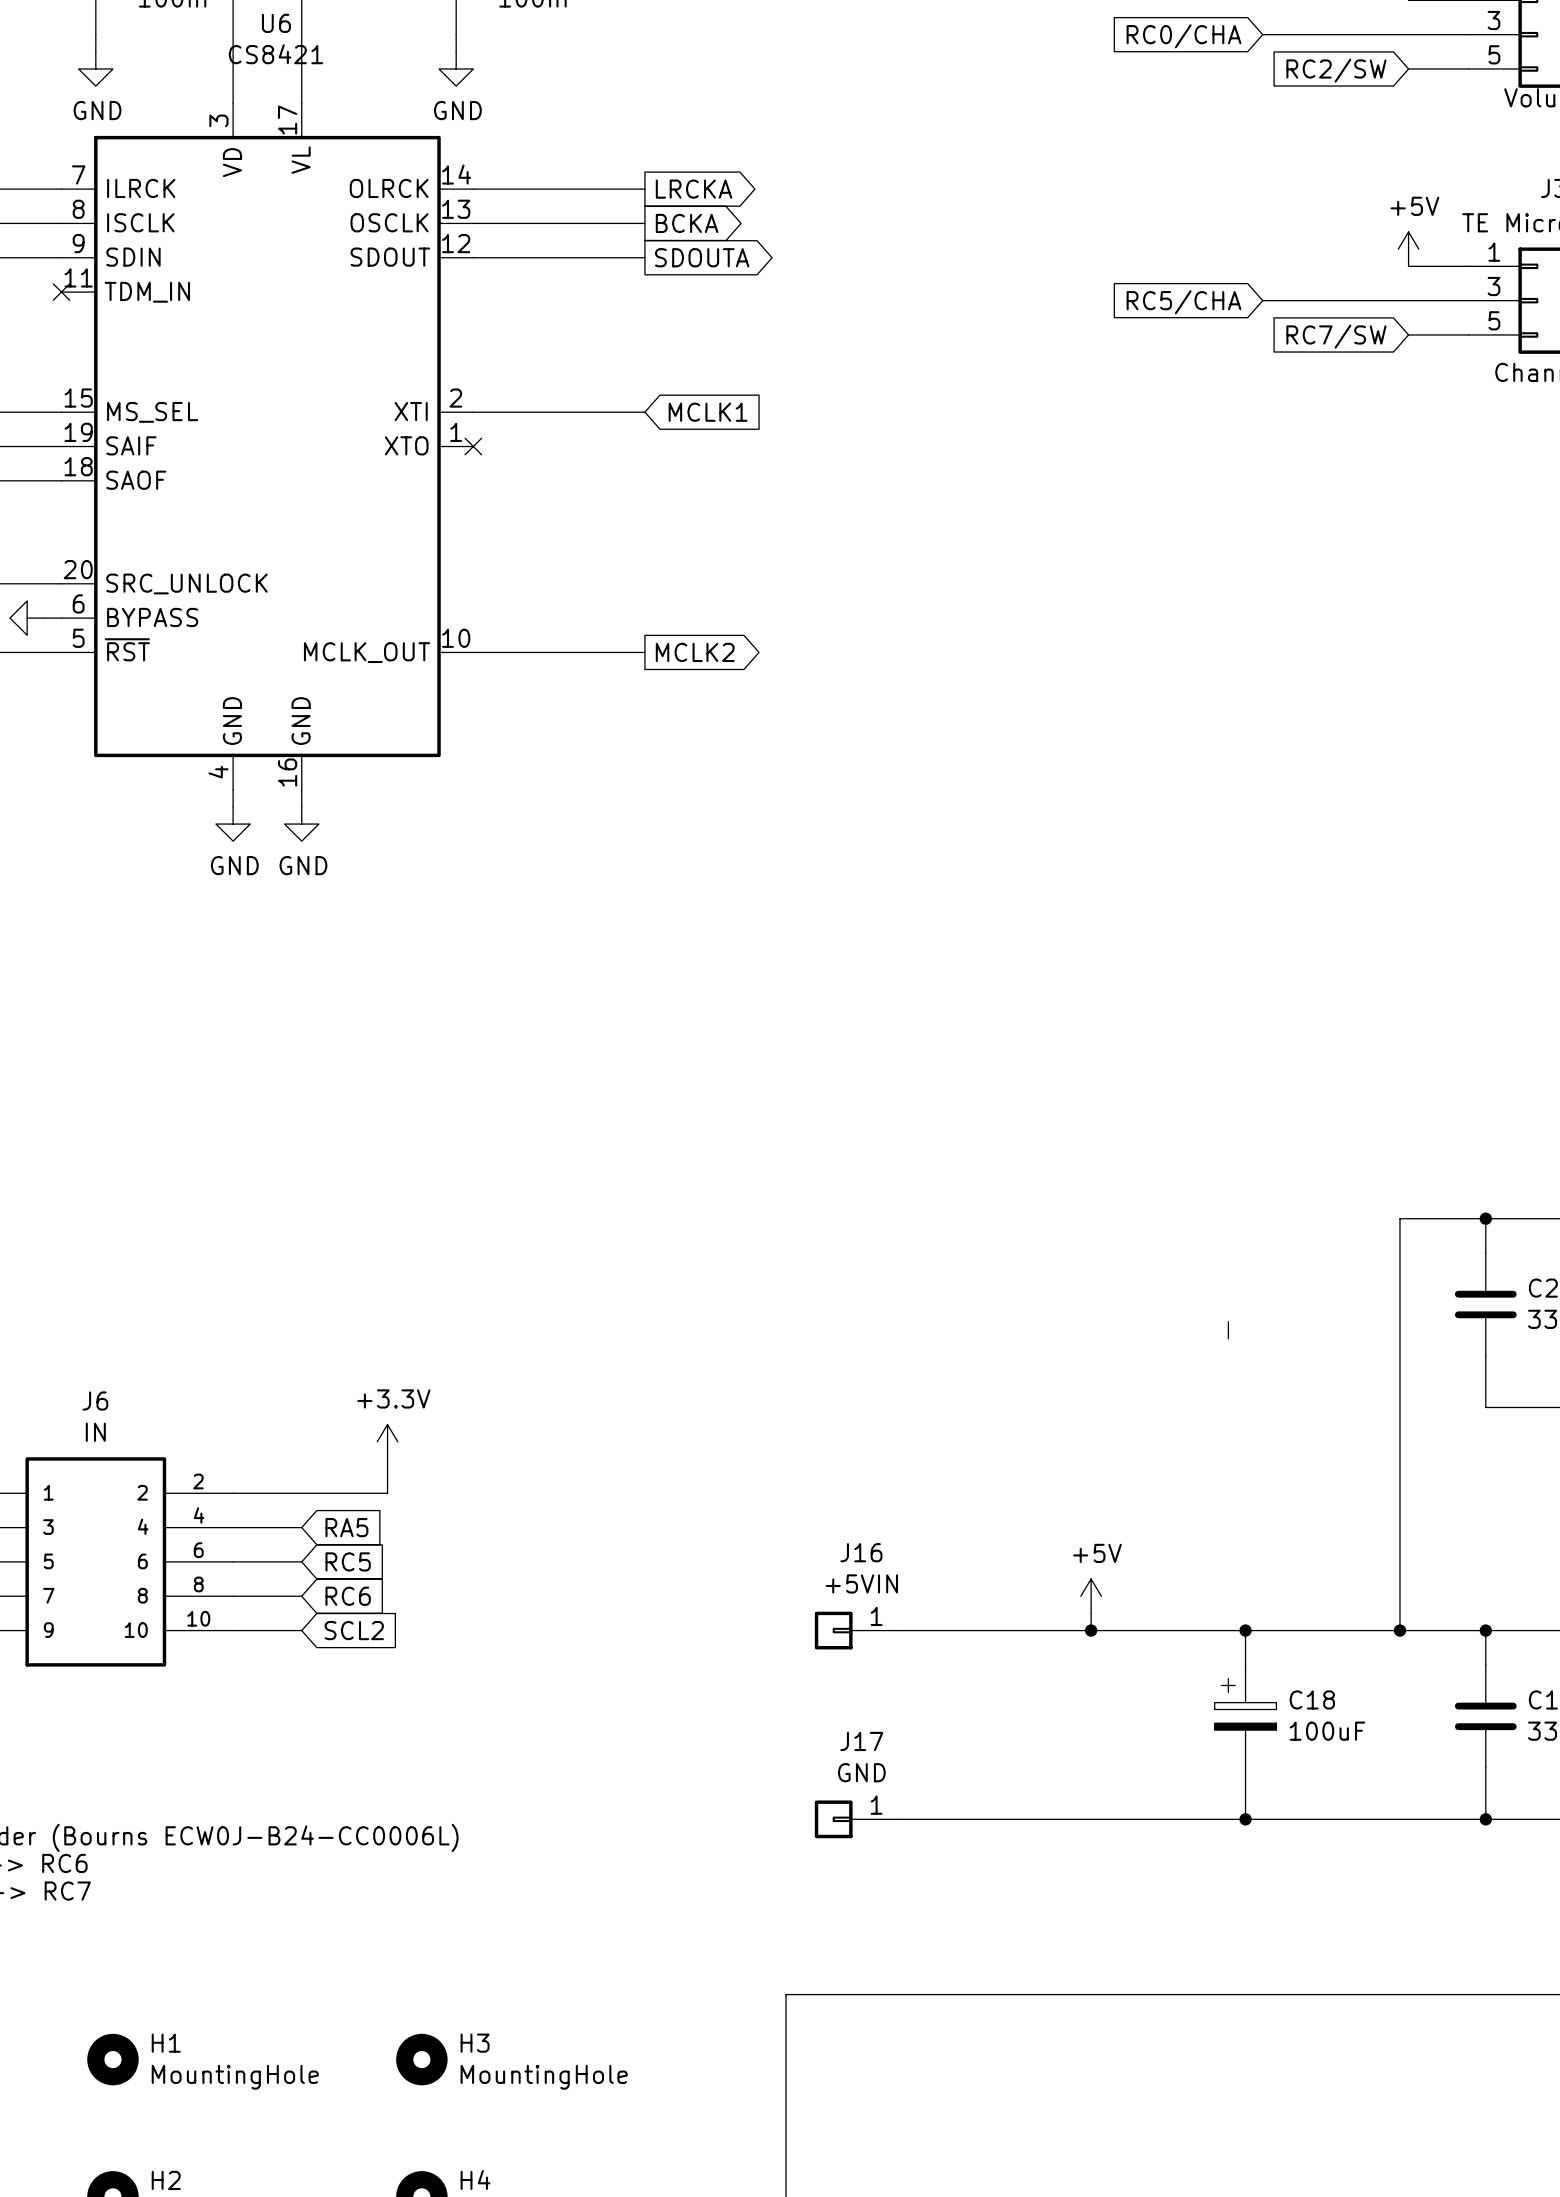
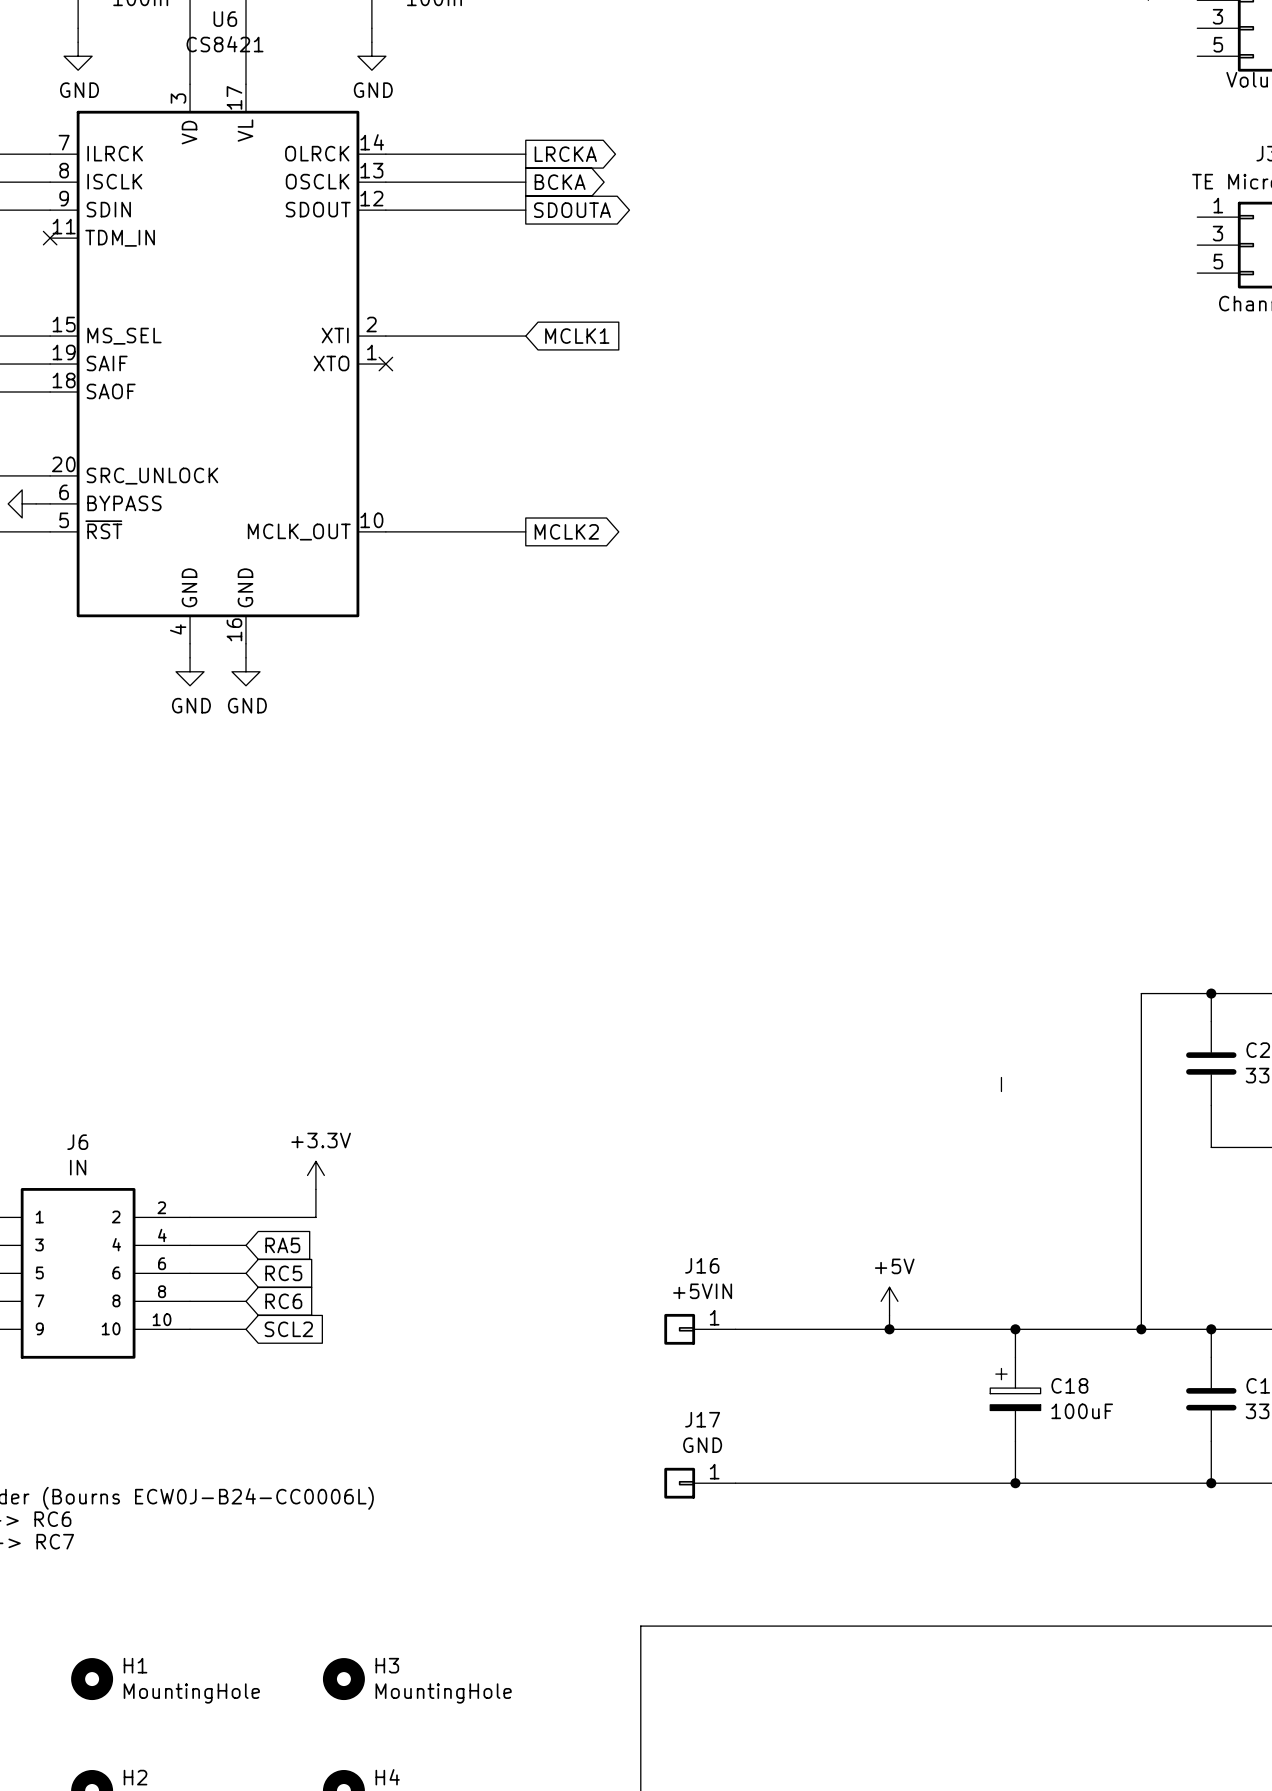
wire: (1408, 0) (1468, 0) -> none
wire: (1262, 34) (1468, 34) -> none
global label: RC0/CHA (1184, 36) -> none
wire: (1408, 68) (1468, 68) -> none
global label: RC2/SW (1336, 70) -> none
power symbol: +5V (1408, 249) -> none
wire: (1408, 266) (1468, 266) -> none
wire: (1262, 300) (1468, 300) -> none
global label: RC5/CHA (1184, 302) -> none
wire: (1408, 334) (1468, 334) -> none
global label: RC7/SW (1336, 336) -> none

